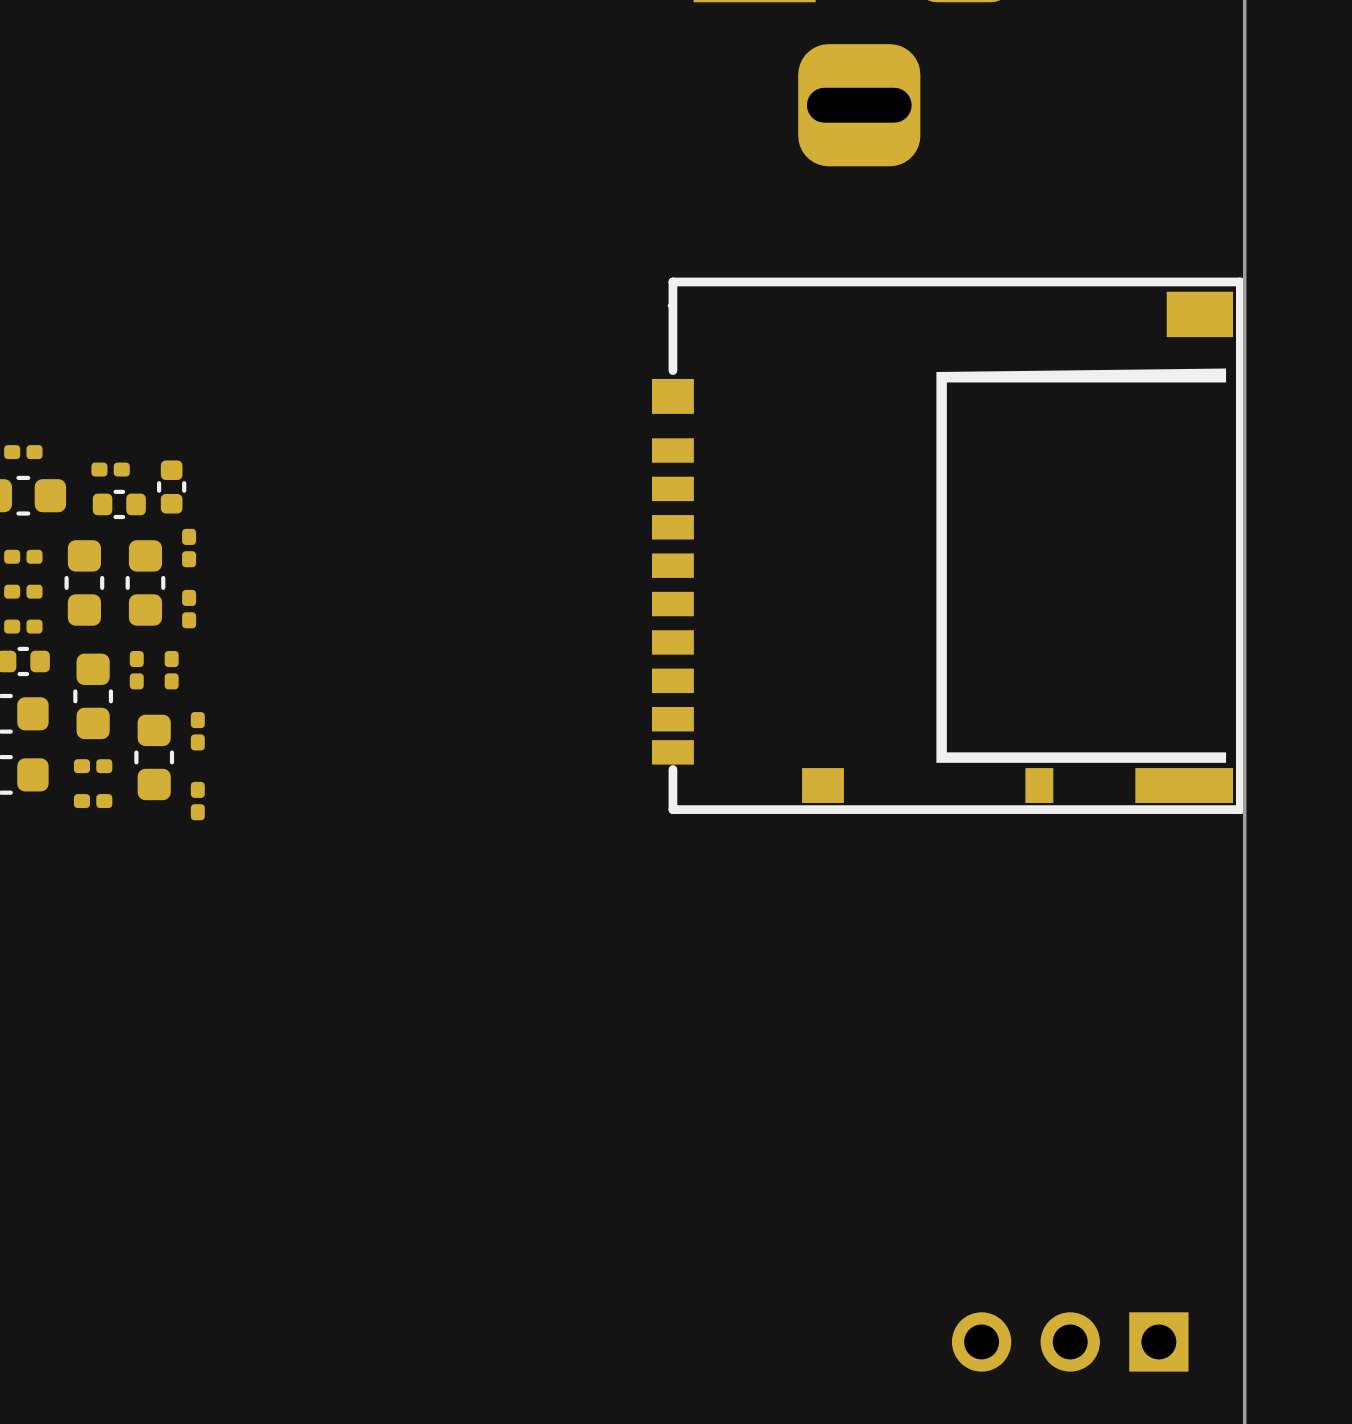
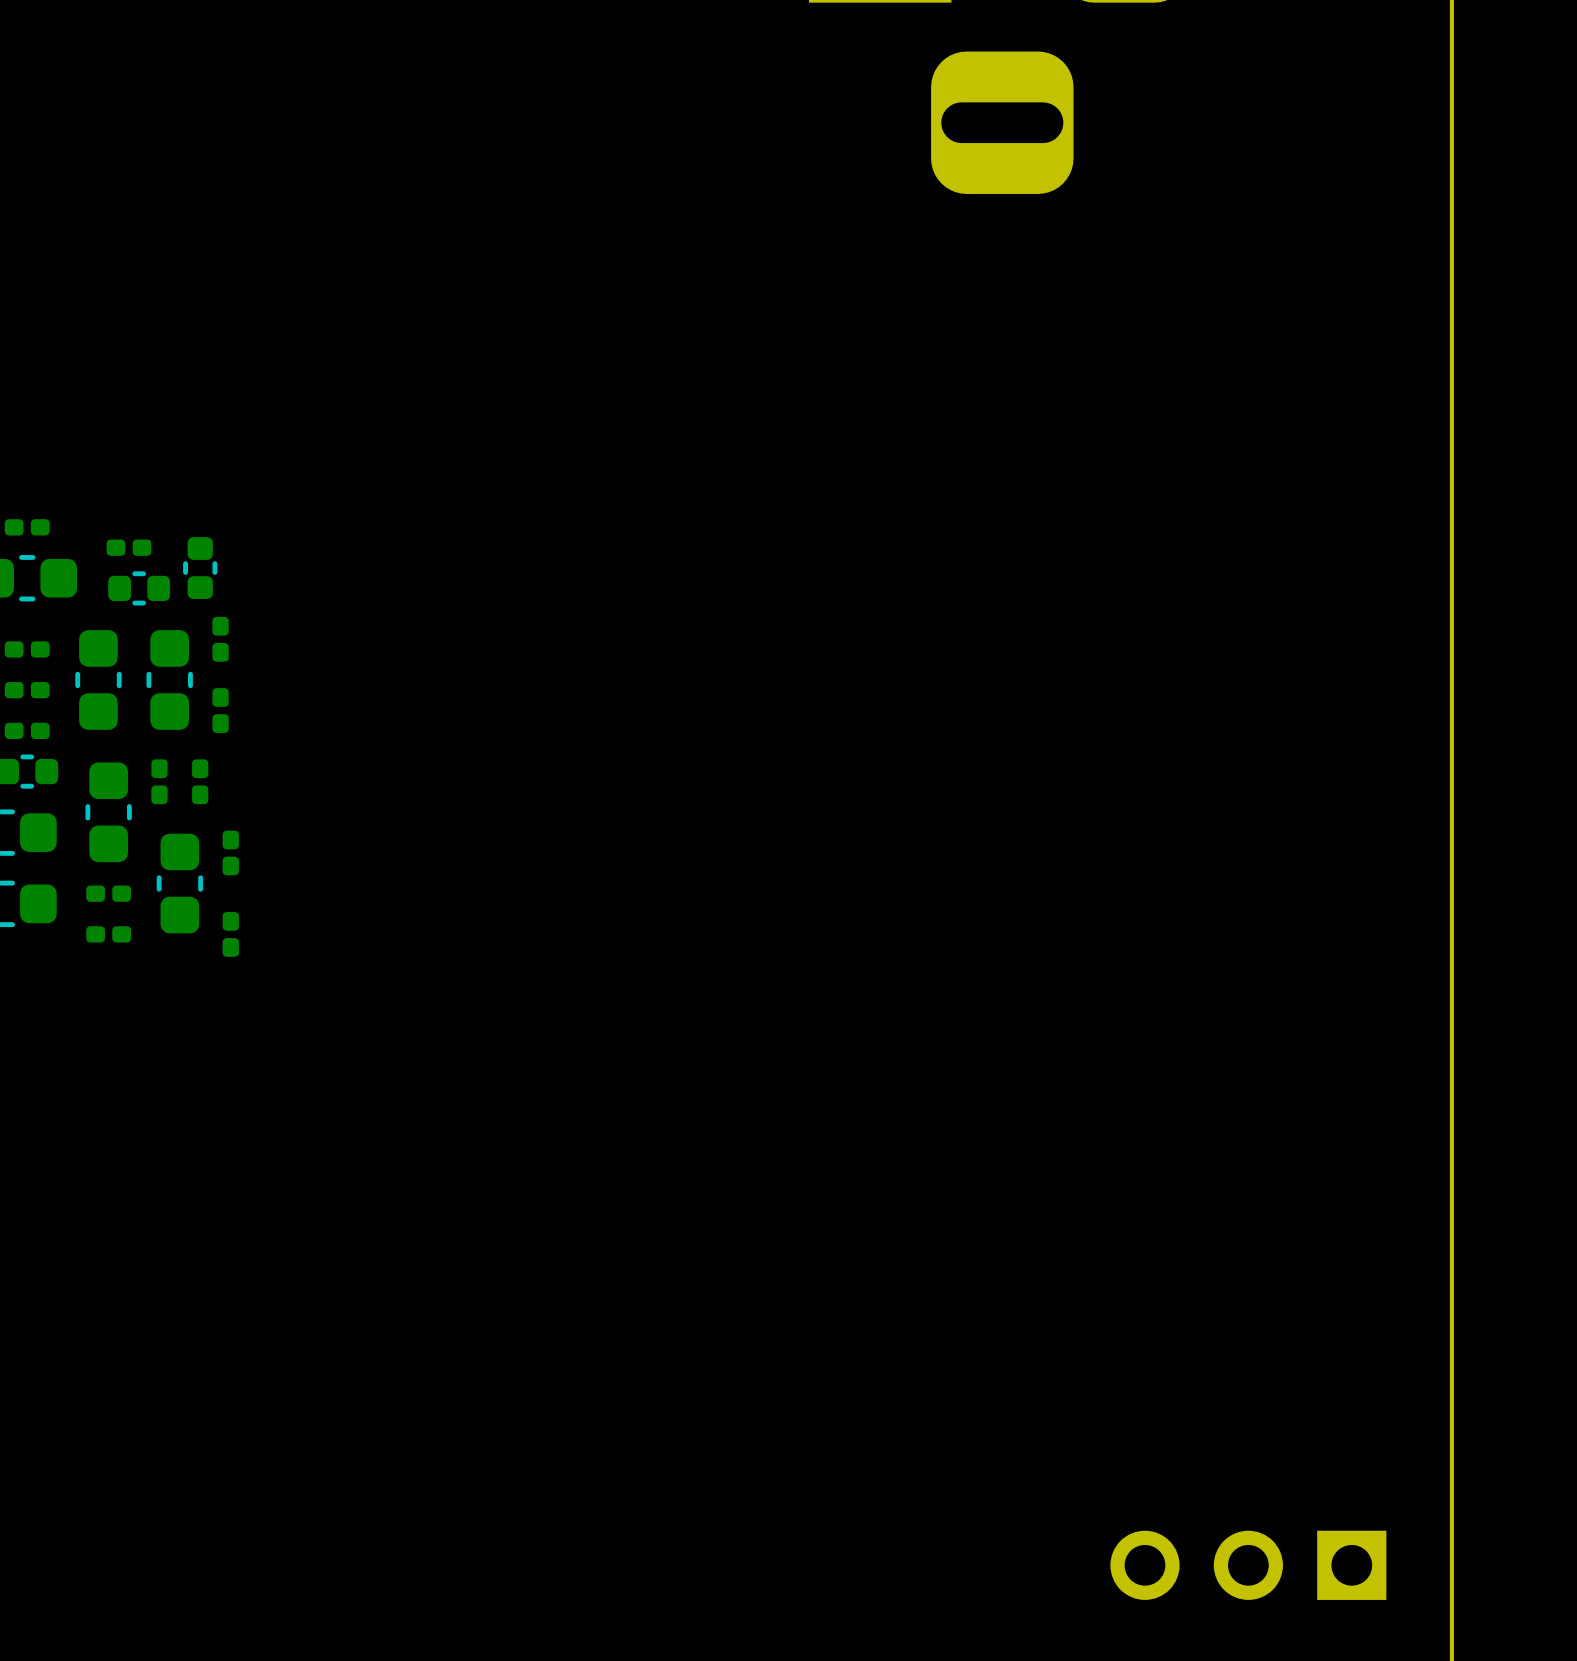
part: (948, 545) -> none

